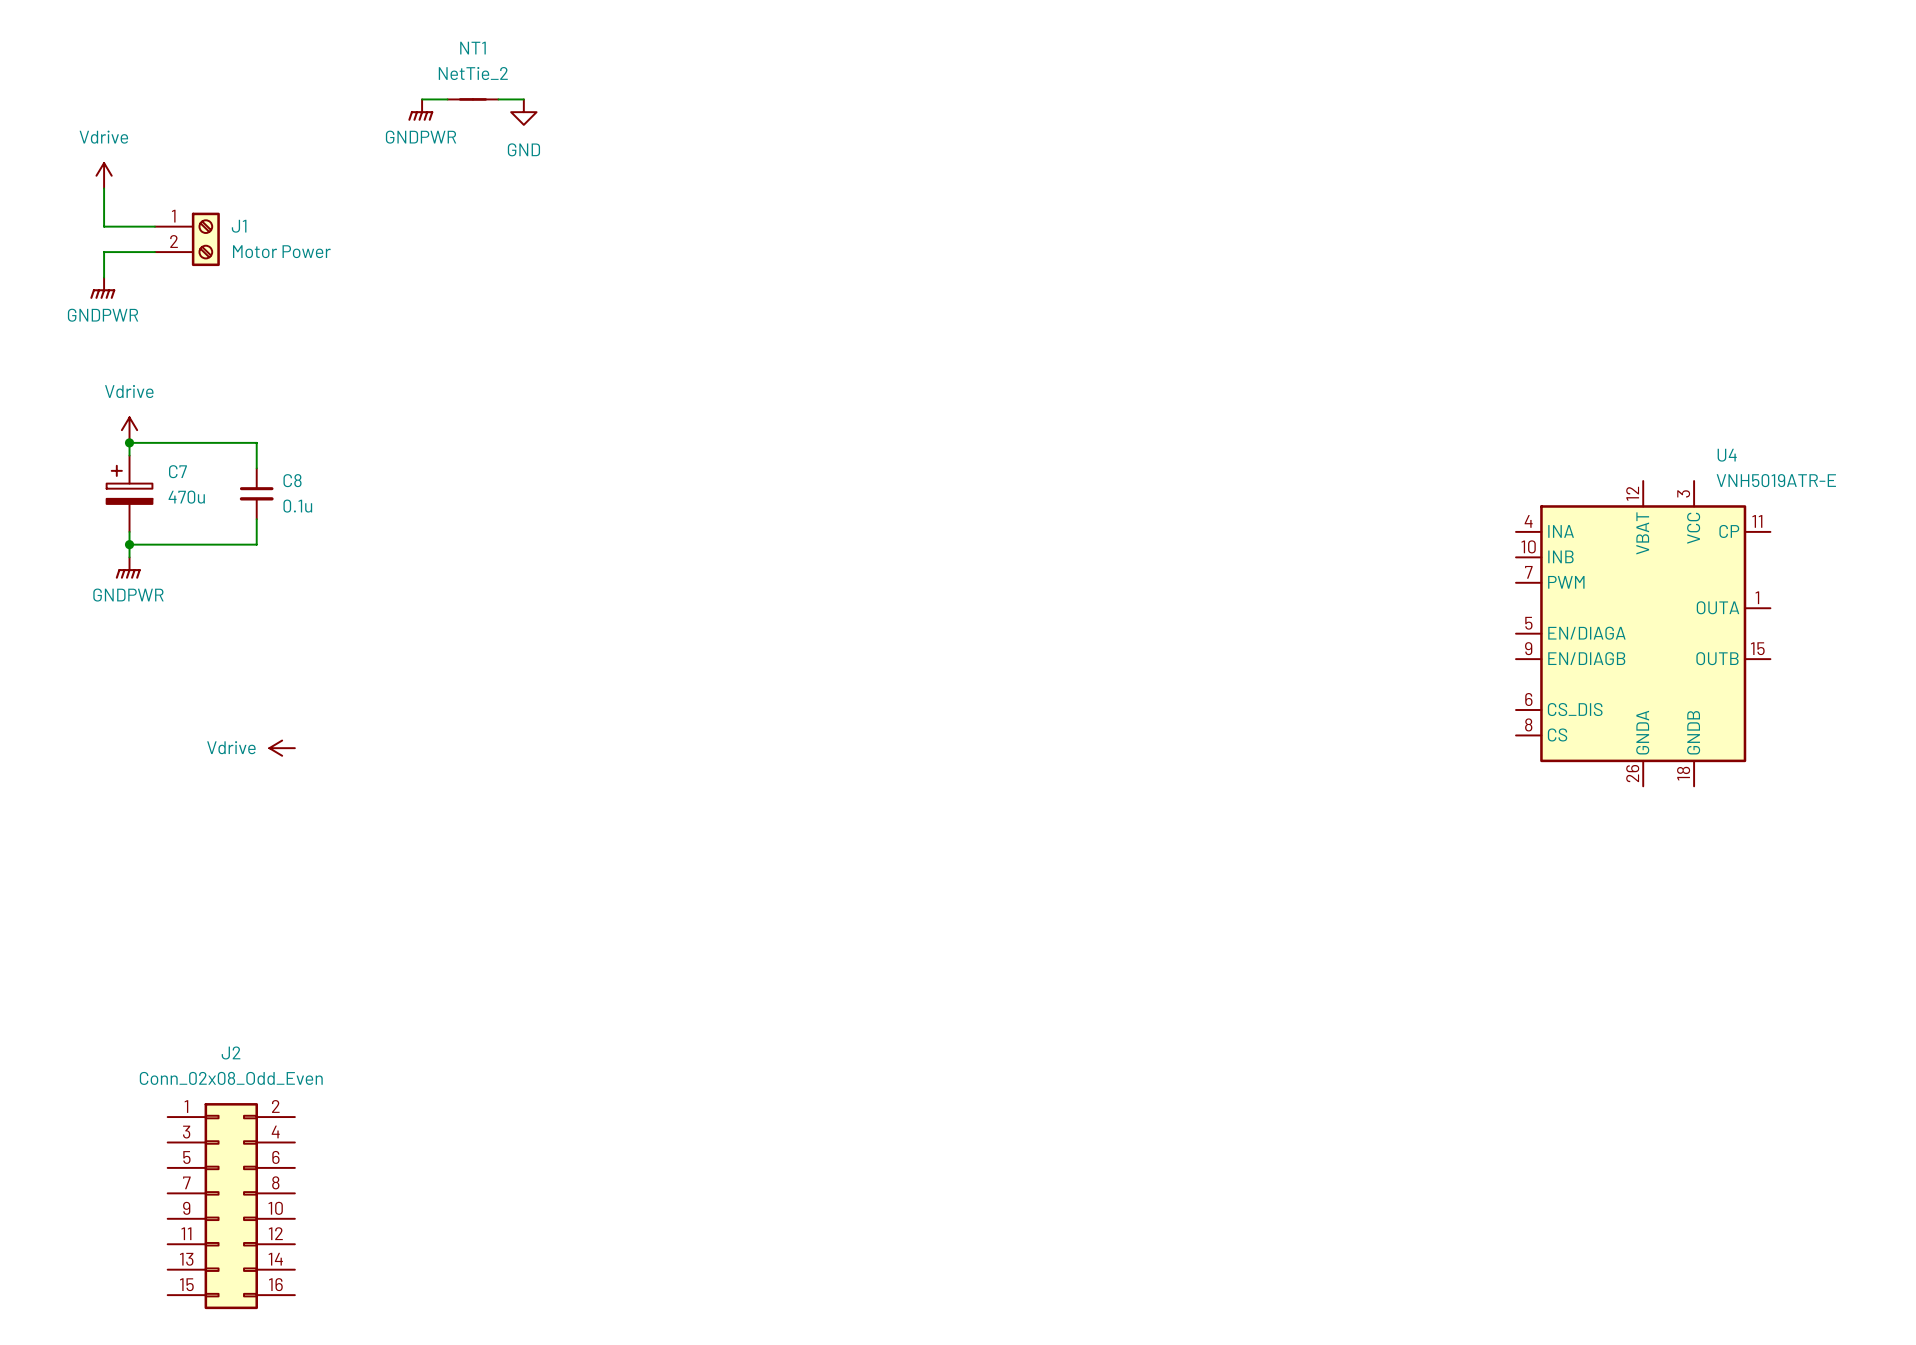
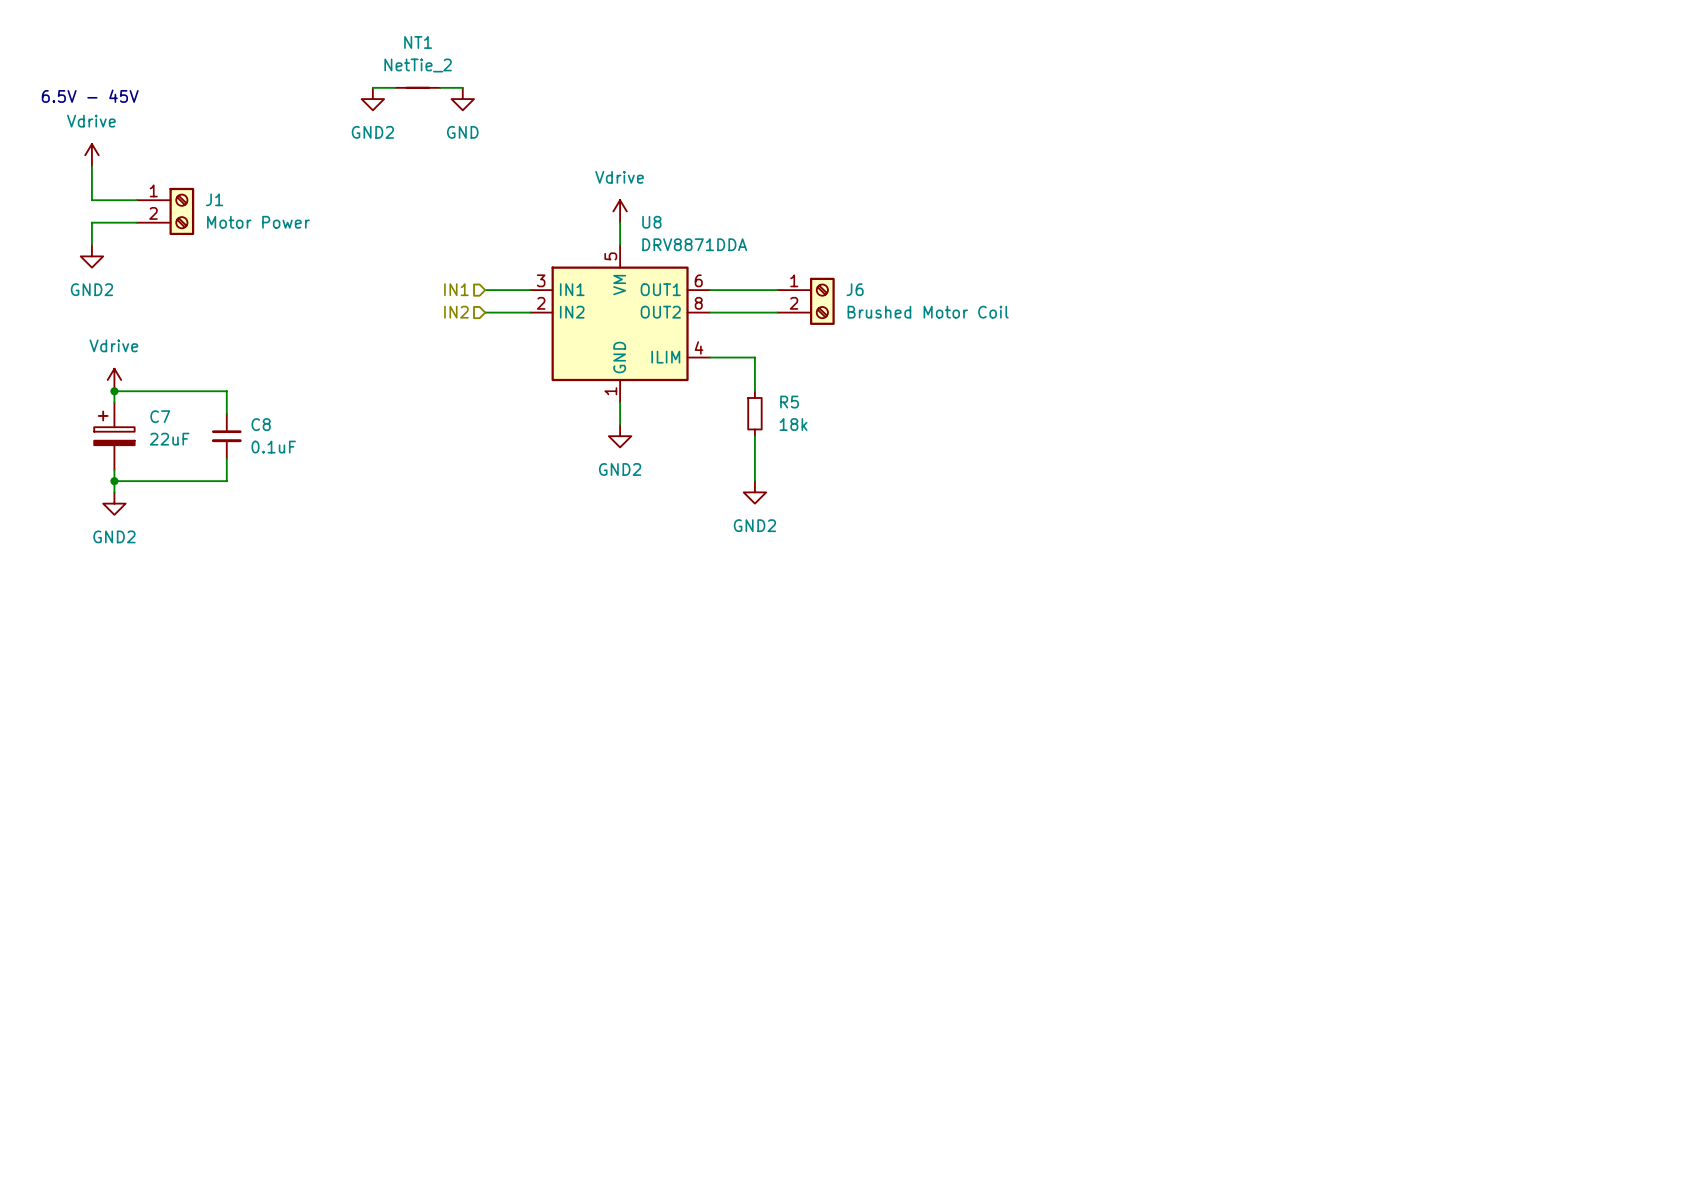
text: none -> 6.5V - 45V (90, 96)
power symbol: GNDPWR (420, 110) -> GND2 (372, 99)
power symbol: none -> Vdrive (620, 211)
wire: none -> (620, 222) (620, 245)
power symbol: GNDPWR (102, 288) -> GND2 (91, 256)
hierarchical label: none -> IN1 (456, 289)
wire: none -> (485, 290) (530, 290)
wire: none -> (709, 290) (777, 290)
J6: none -> Brushed Motor Coil (806, 301)
hierarchical label: none -> IN2 (456, 312)
wire: none -> (485, 312) (530, 312)
wire: none -> (709, 312) (777, 312)
U8: none -> DRV8871DDA (620, 323)
wire: none -> (709, 357) (754, 357) (754, 391)
wire: none -> (620, 402) (620, 424)
R5: none -> 18k (754, 413)
power symbol: none -> GND2 (620, 436)
wire: none -> (754, 436) (754, 481)
C7 value: 470u (186, 497) -> 22uF (169, 439)
C8 value: 0.1u (297, 506) -> 0.1uF (273, 447)
power symbol: none -> GND2 (754, 492)
power symbol: GNDPWR (128, 568) -> GND2 (114, 503)
U4: VNH5019ATR-E (1643, 633) -> none
power symbol: Vdrive (282, 748) -> none
J2: Conn_02x08_Odd_Even (231, 1206) -> none

